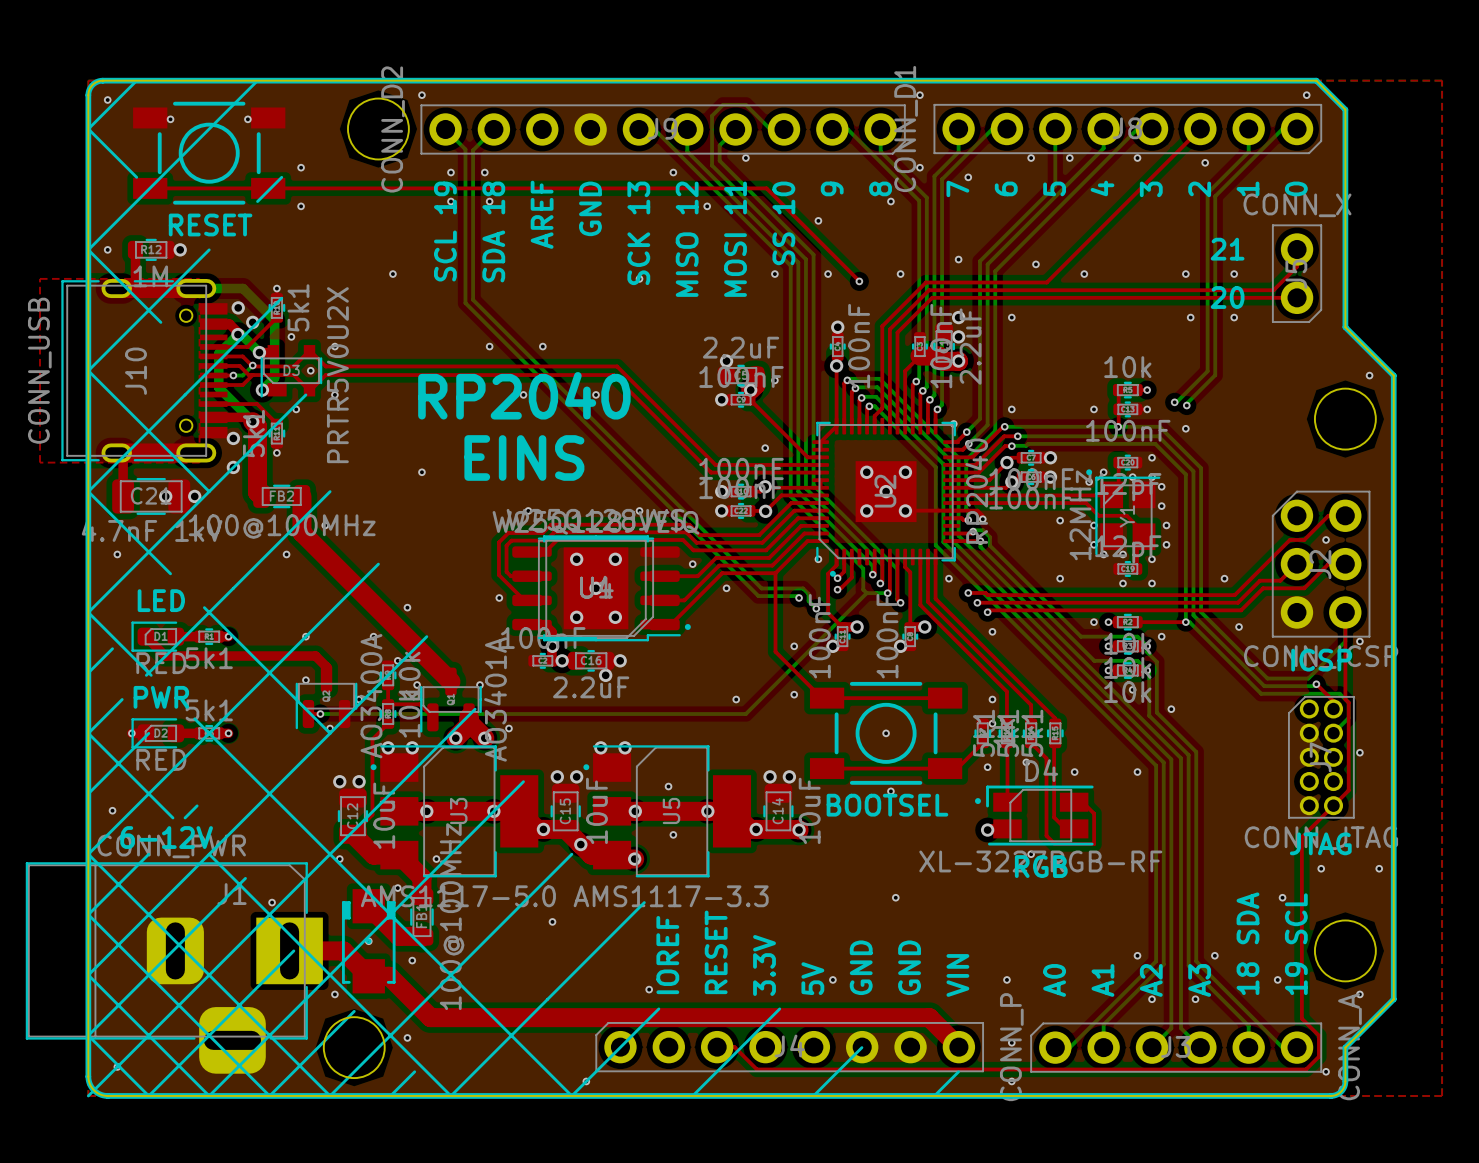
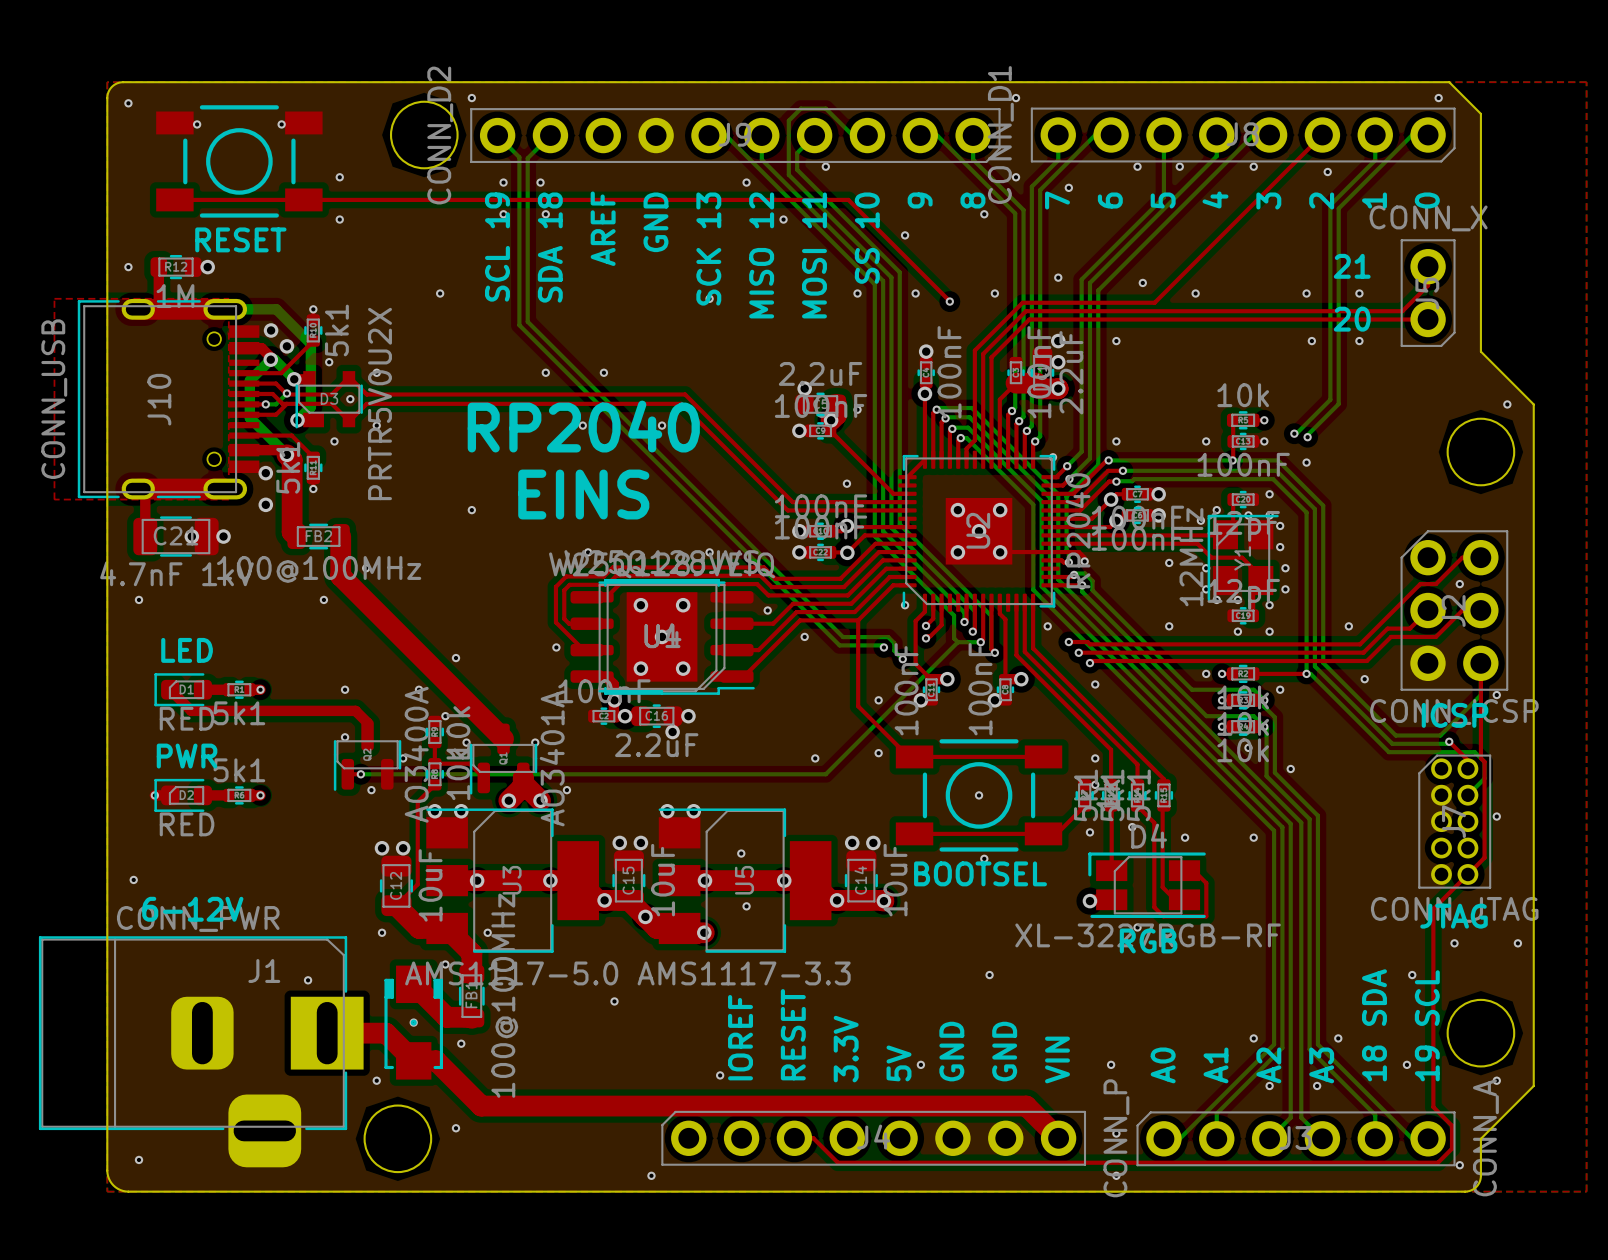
line: (102, 80) (1316, 80) (1345, 109) (1345, 327) (1393, 375) (1393, 999) (1345, 1047) (1345, 1083) (1342, 1090) (1330, 1095) (107, 1095) (95, 1091) (90, 1085) (88, 1076) (88, 95) (92, 84) (102, 80) -> none
line: (136, 80) (88, 129) (136, 177) -> none
line: (257, 80) (88, 249) (160, 322) -> none
line: (281, 177) (257, 201) -> none
line: (209, 249) (88, 370) (209, 491) -> none
line: (281, 298) (88, 491) (170, 573) -> none
line: (305, 394) (88, 612) (151, 675) -> none
drawing: [1086, 469, 1093, 476] -> none
line: (330, 491) (146, 675) -> none
line: (378, 564) (88, 854) (330, 1095) (571, 854) -> none
drawing: [829, 570, 836, 577] -> none
line: (204, 607) (330, 733) -> none
drawing: [684, 624, 691, 630] -> none
line: (426, 636) (88, 975) (209, 1095) (523, 781) -> none
line: (112, 648) (88, 672) -> none
line: (122, 699) (88, 733) (172, 817) -> none
line: (475, 709) (88, 1095) -> none
line: (194, 718) (571, 1095) (658, 1008) -> none
line: (148, 733) (88, 793) -> none
drawing: [370, 764, 377, 771] -> none
drawing: [583, 764, 590, 771] -> none
drawing: [975, 798, 981, 804] -> none
line: (197, 805) (185, 817) -> none
line: (148, 854) (88, 914) (269, 1095) (354, 1011) -> none
line: (209, 854) (450, 1095) (644, 902) -> none
line: (245, 878) (88, 1035) (148, 1095) (293, 950) -> none
line: (779, 1008) (692, 1095) -> none
line: (861, 1047) (813, 1095) -> none
line: (414, 1071) (390, 1095) -> none
line: (958, 1071) (934, 1095) -> none

